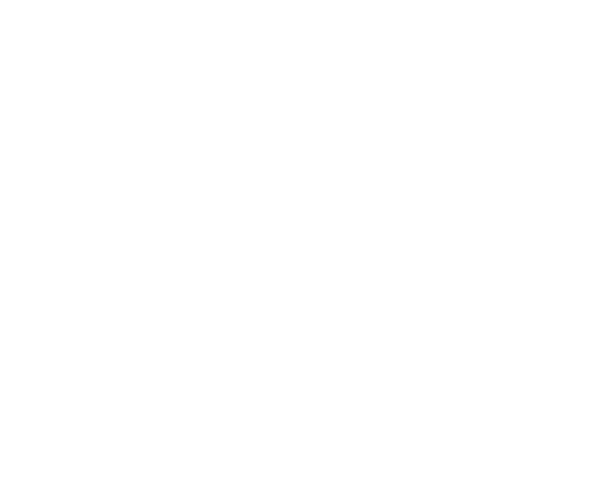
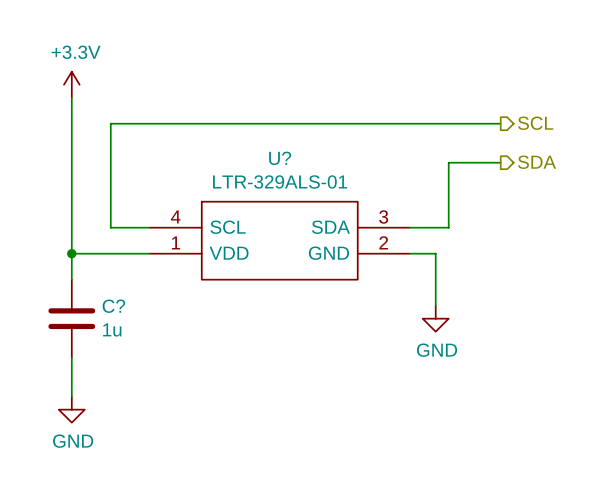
power symbol: none -> +3.3V (71, 84)
wire: none -> (71, 97) (71, 279)
wire: none -> (500, 123) (110, 123) (110, 227) (149, 227)
hierarchical label: none -> SCL (535, 123)
wire: none -> (500, 162) (448, 162) (448, 227) (409, 227)
hierarchical label: none -> SDA (537, 162)
U?: none -> LTR-329ALS-01 (279, 240)
wire: none -> (71, 253) (149, 253)
junction: none -> (71, 253)
wire: none -> (409, 253) (435, 253) (435, 305)
C?: none -> 1u (71, 318)
power symbol: none -> GND (435, 318)
wire: none -> (71, 357) (71, 396)
power symbol: none -> GND (71, 409)

